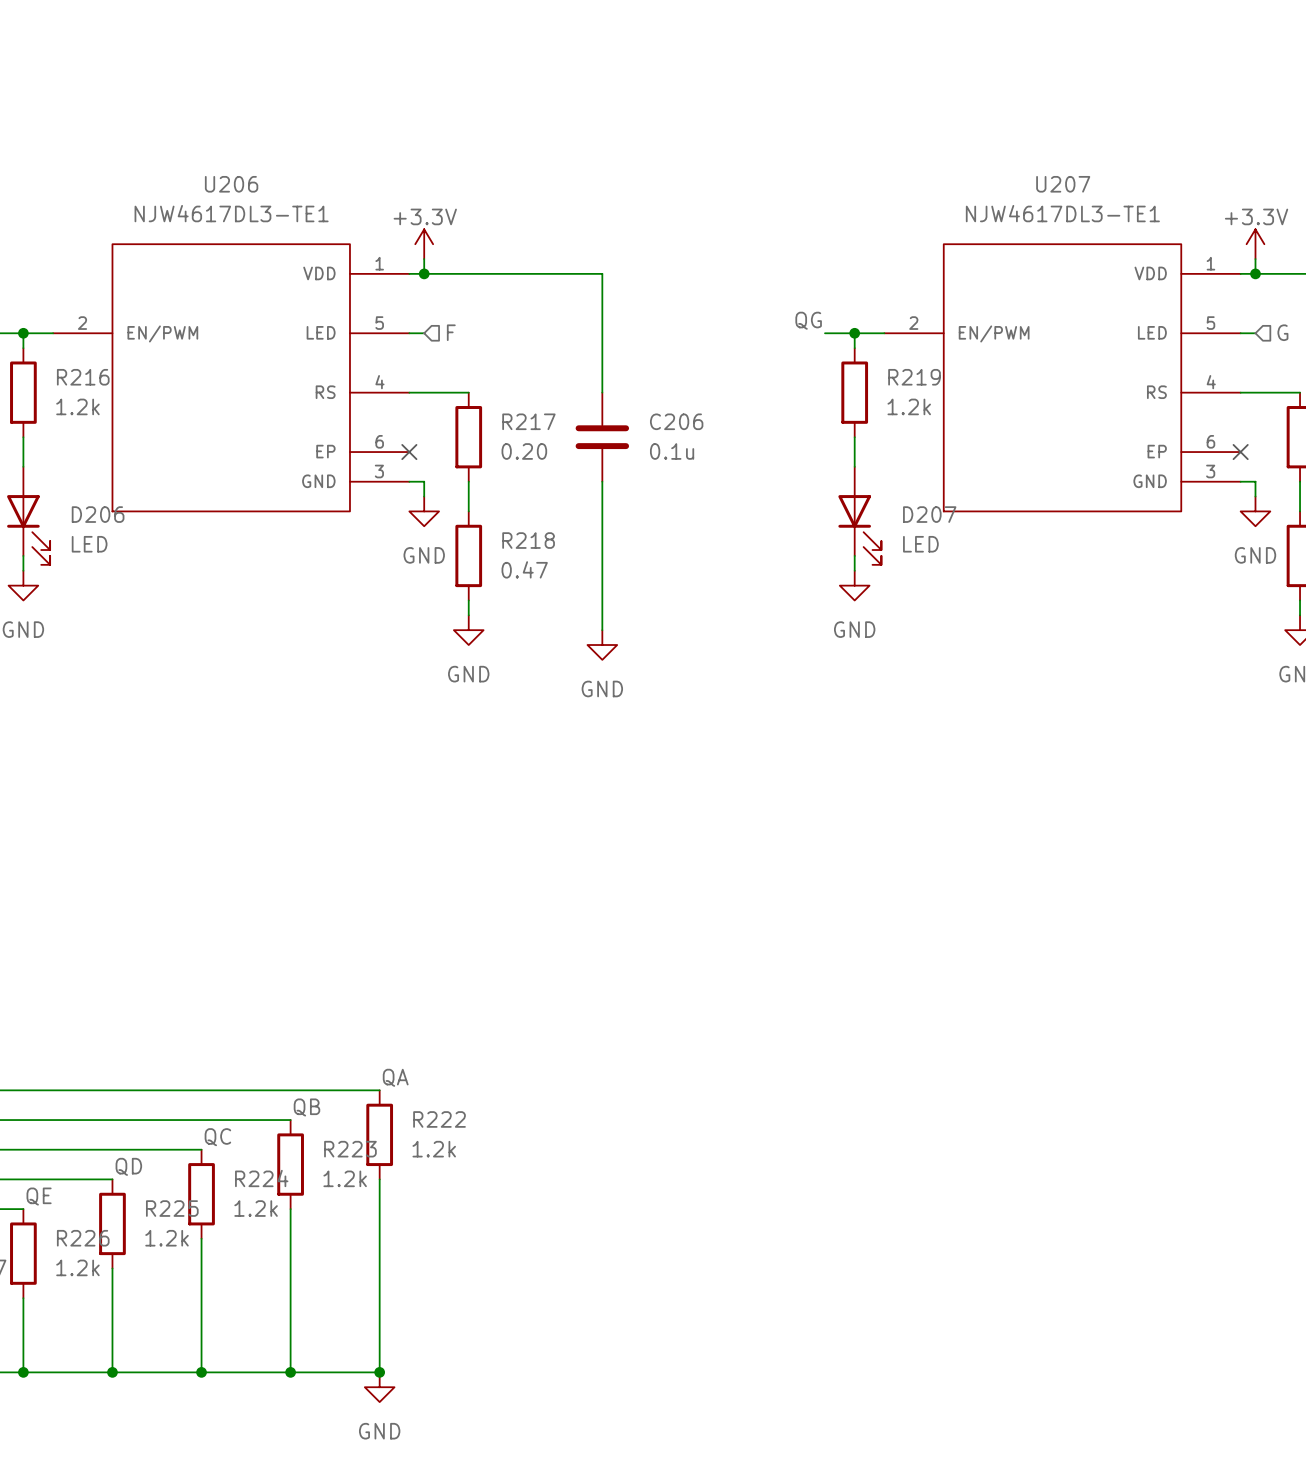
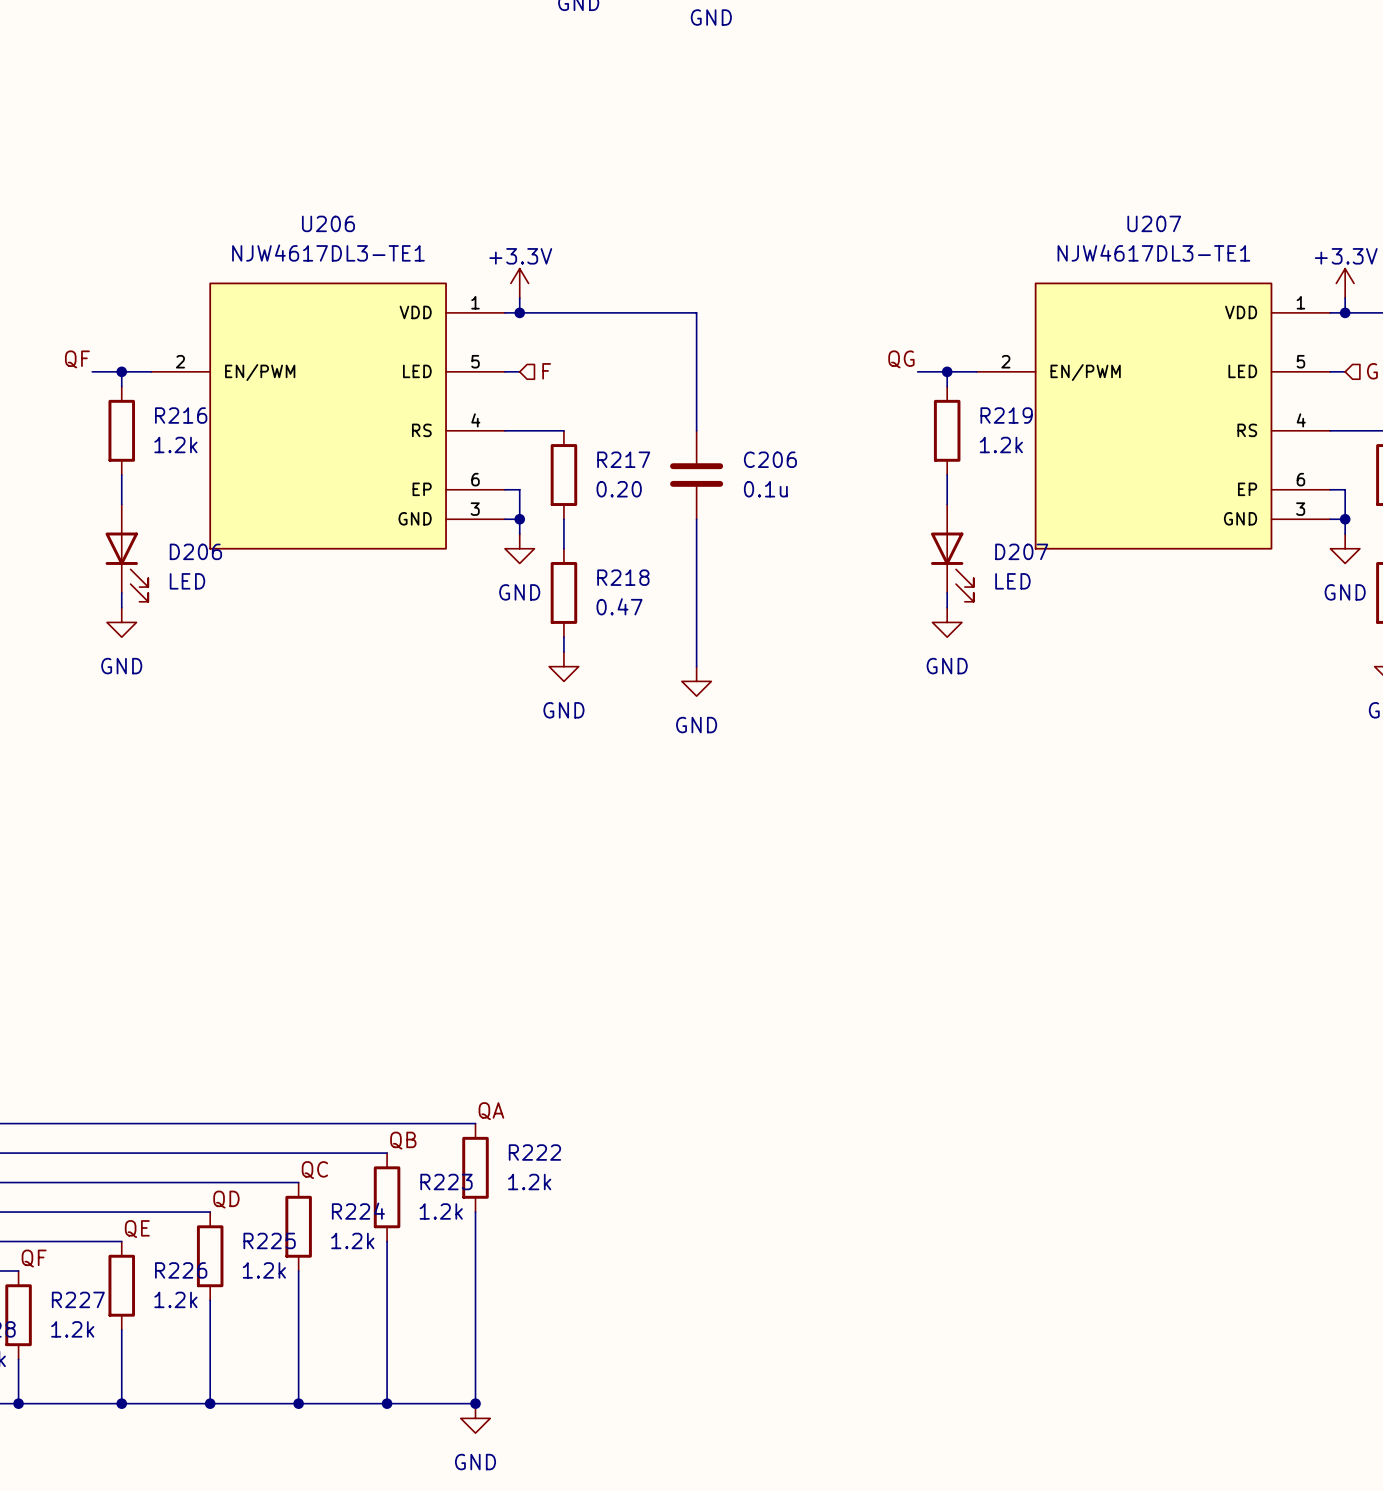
wire: none -> (504, 489) (519, 489) (519, 519)
no-connect mark: (409, 452) -> none
wire: none -> (1330, 489) (1345, 489) (1345, 519)
no-connect mark: (1240, 452) -> none
junction: none -> (519, 519)
junction: none -> (1345, 519)

